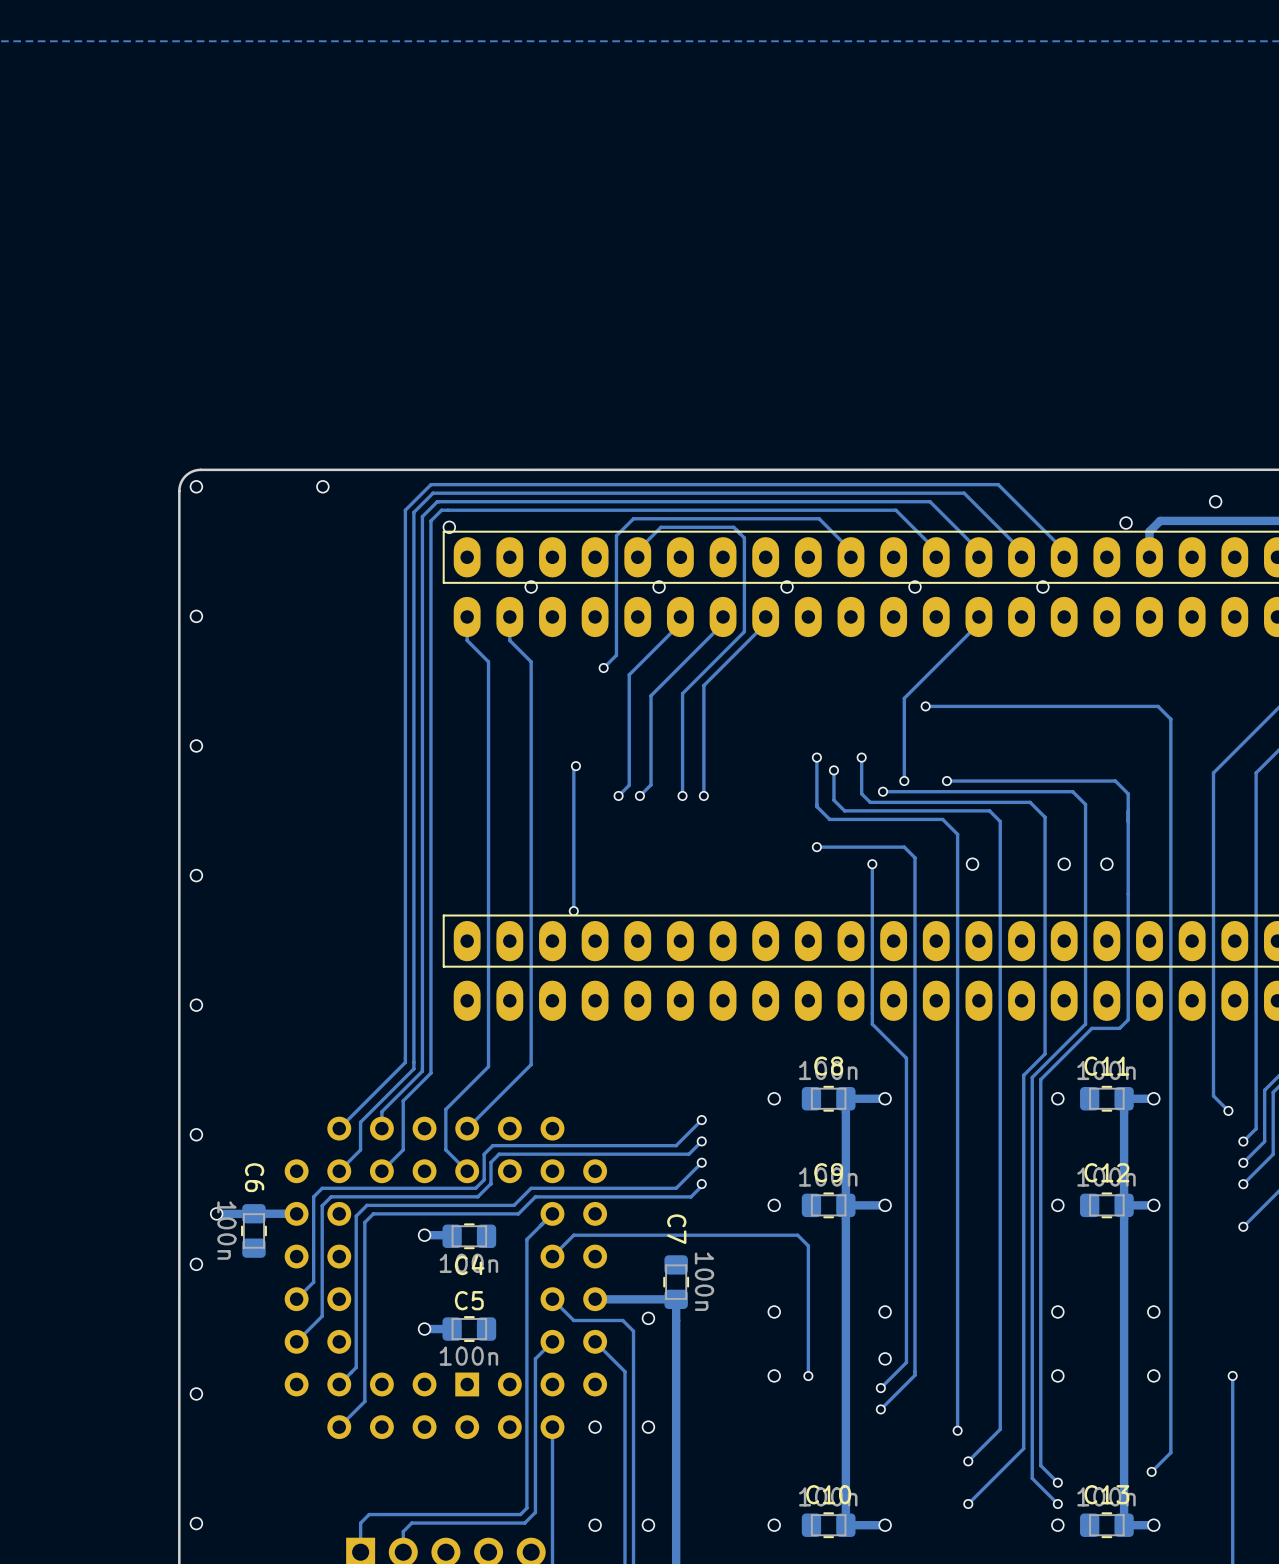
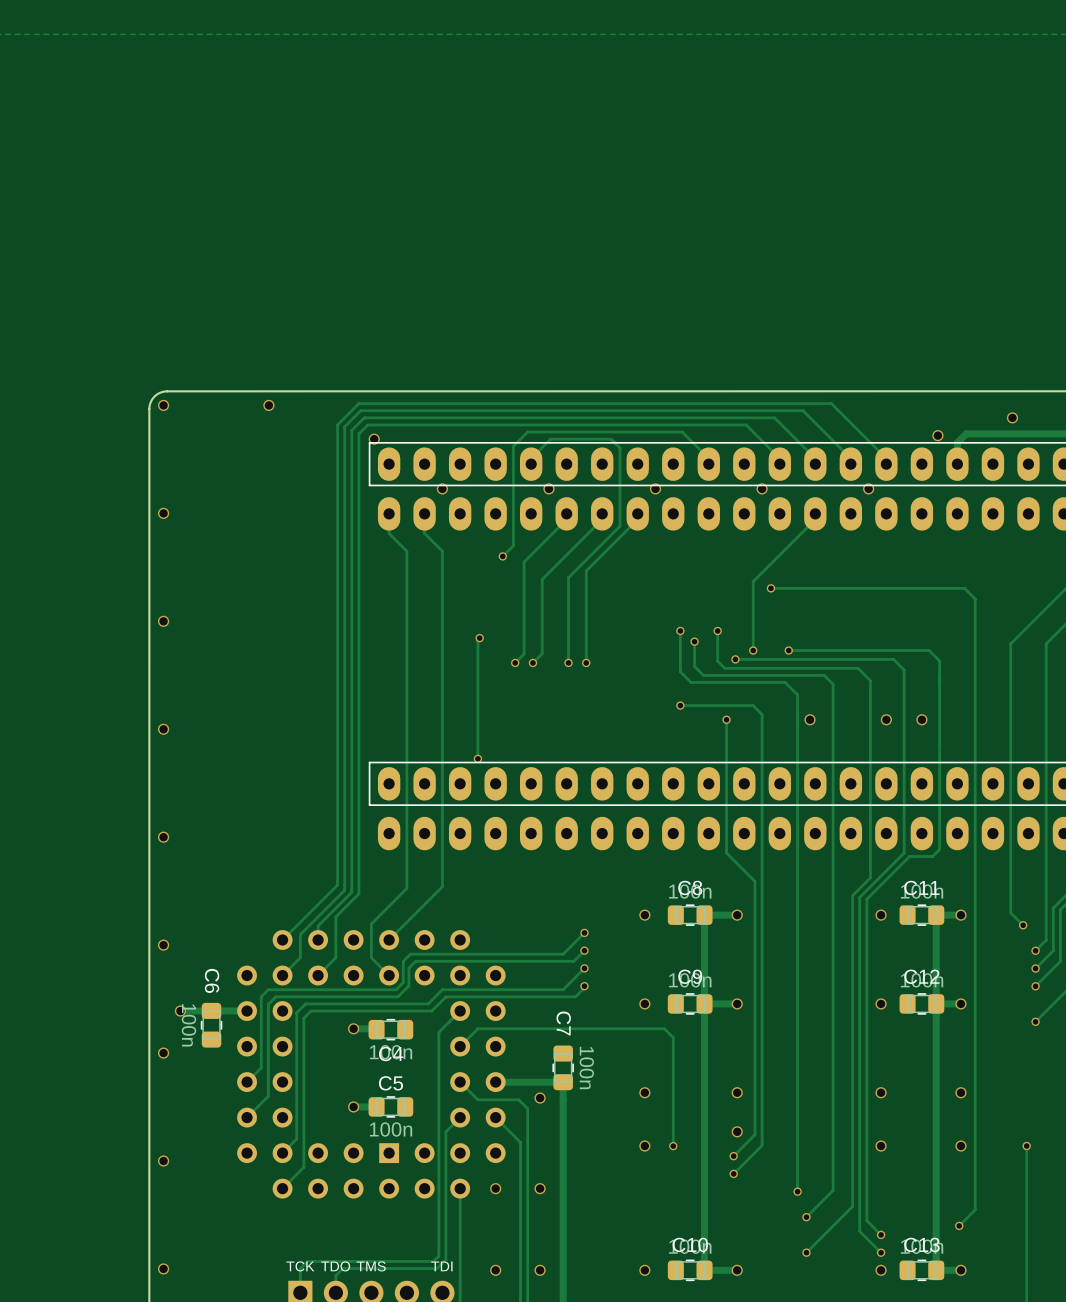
text: none -> TCK (300, 1266)
text: none -> TDO (335, 1266)
text: none -> TMS (371, 1266)
text: none -> TDI (441, 1266)

